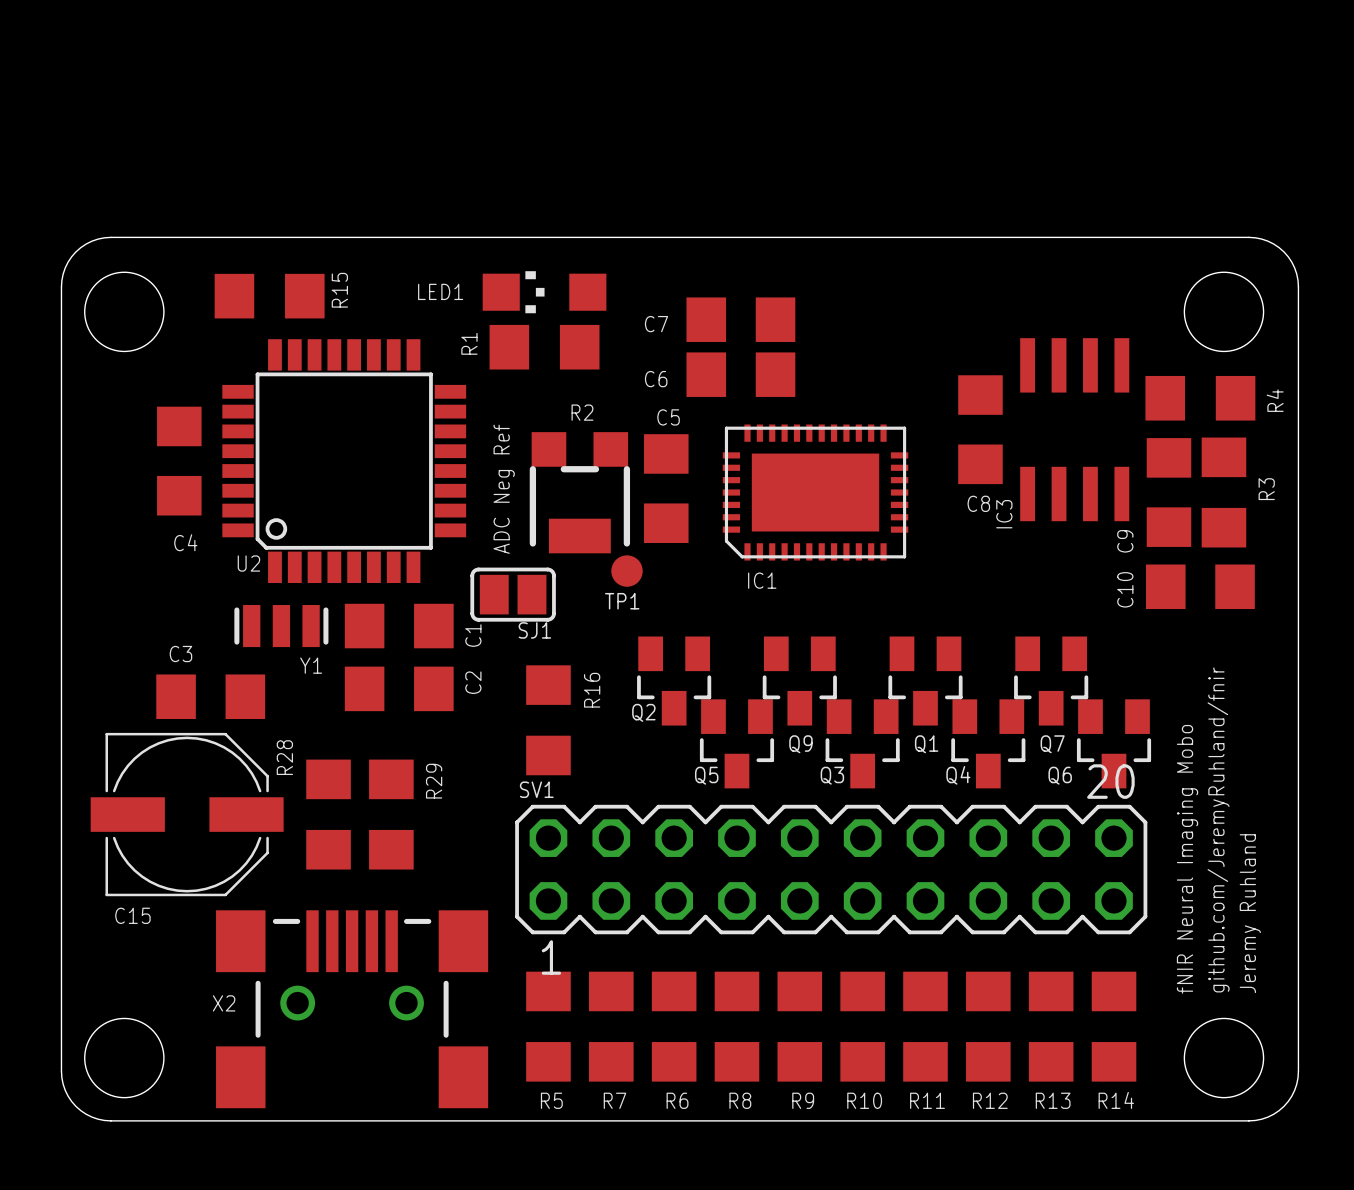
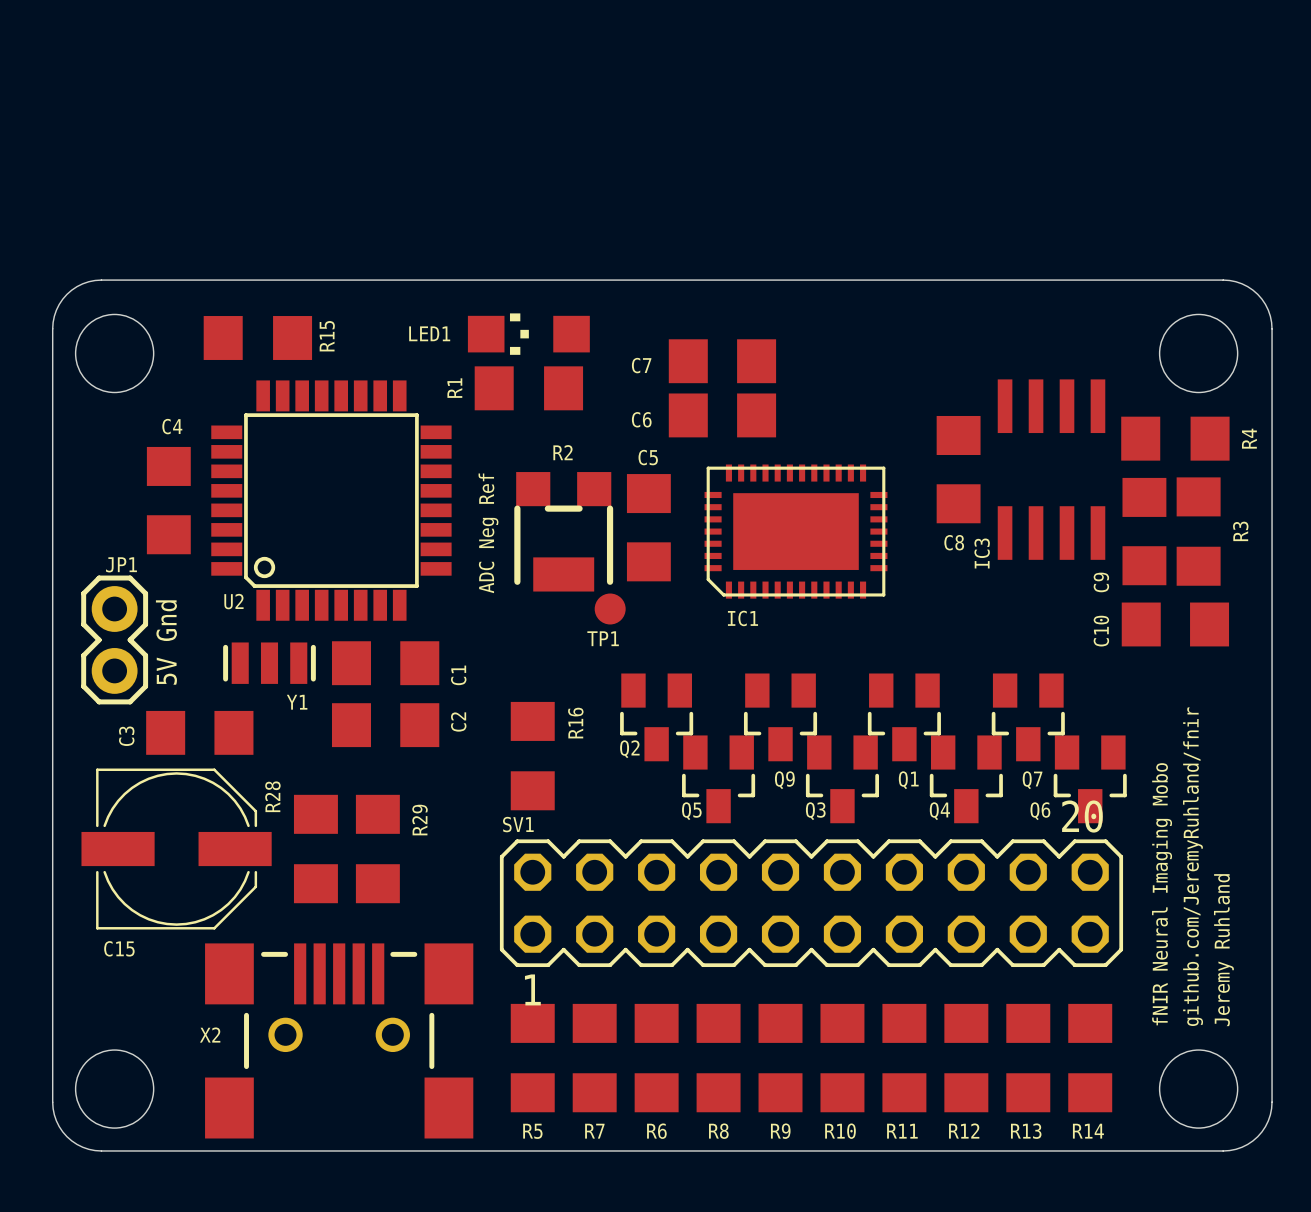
C4 name position: C4 (185, 542) -> C4 (172, 426)
SJ1: (513, 594) -> none
text: none -> 5V Gnd (166, 642)
JP1: none -> (114, 639)
C3 name rotation: 0° (180, 654) -> 90° counterclockwise (126, 736)
C3 name position: C3 (180, 654) -> C3 (126, 736)

